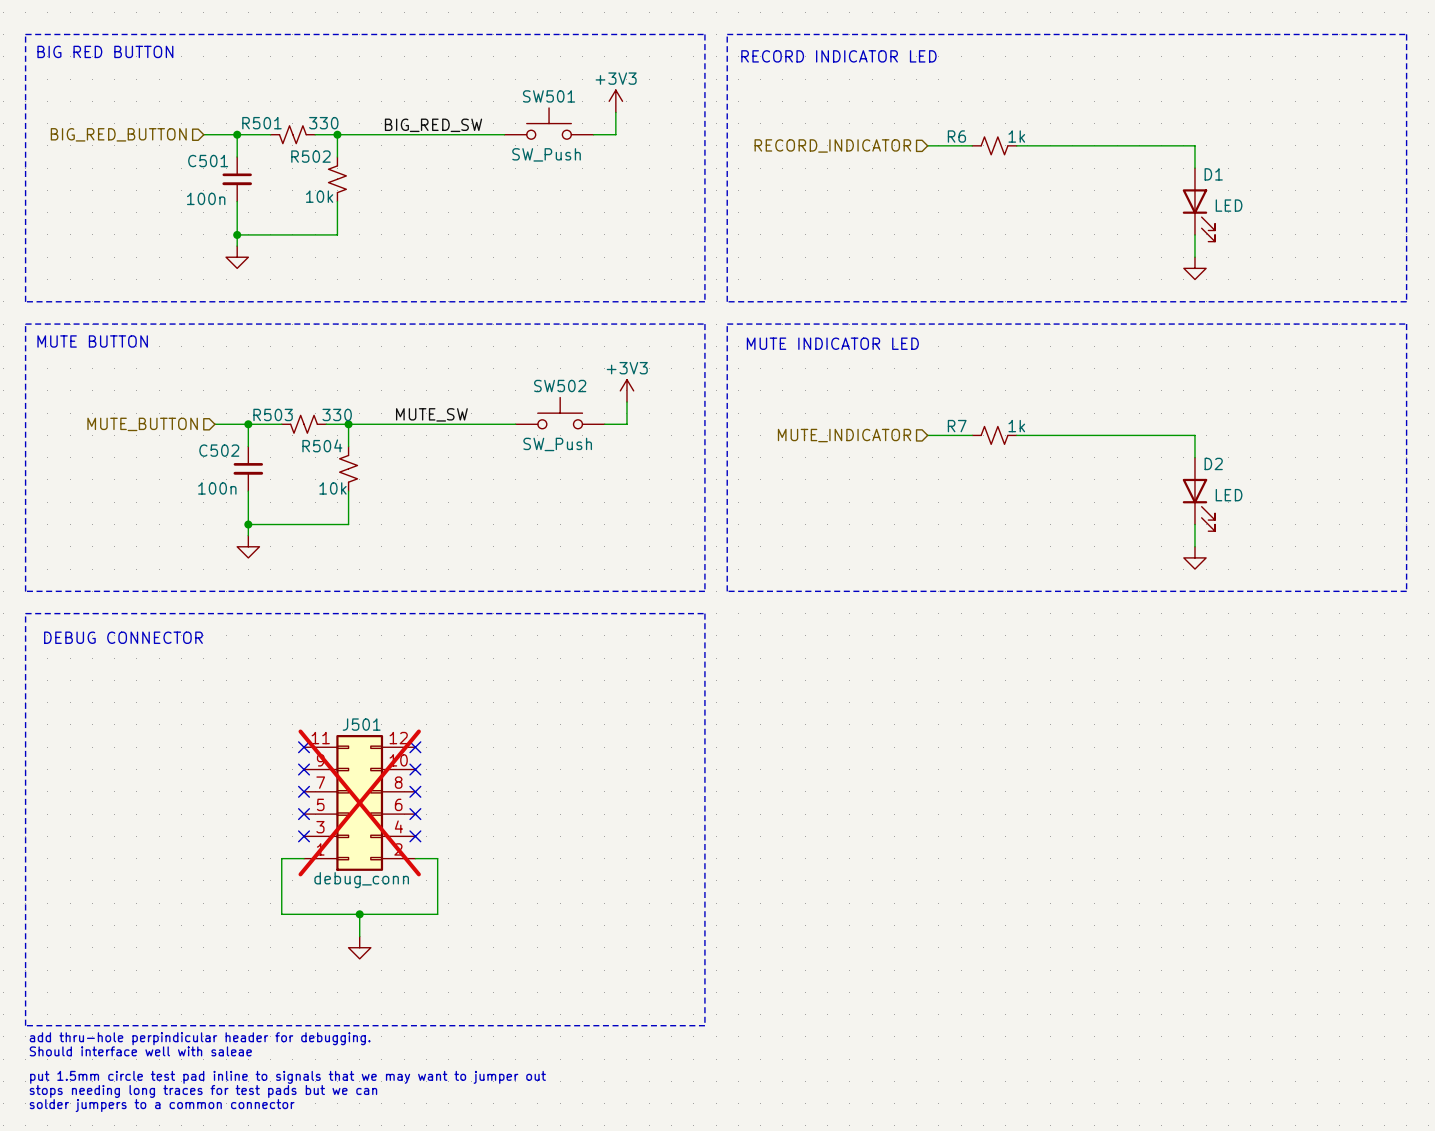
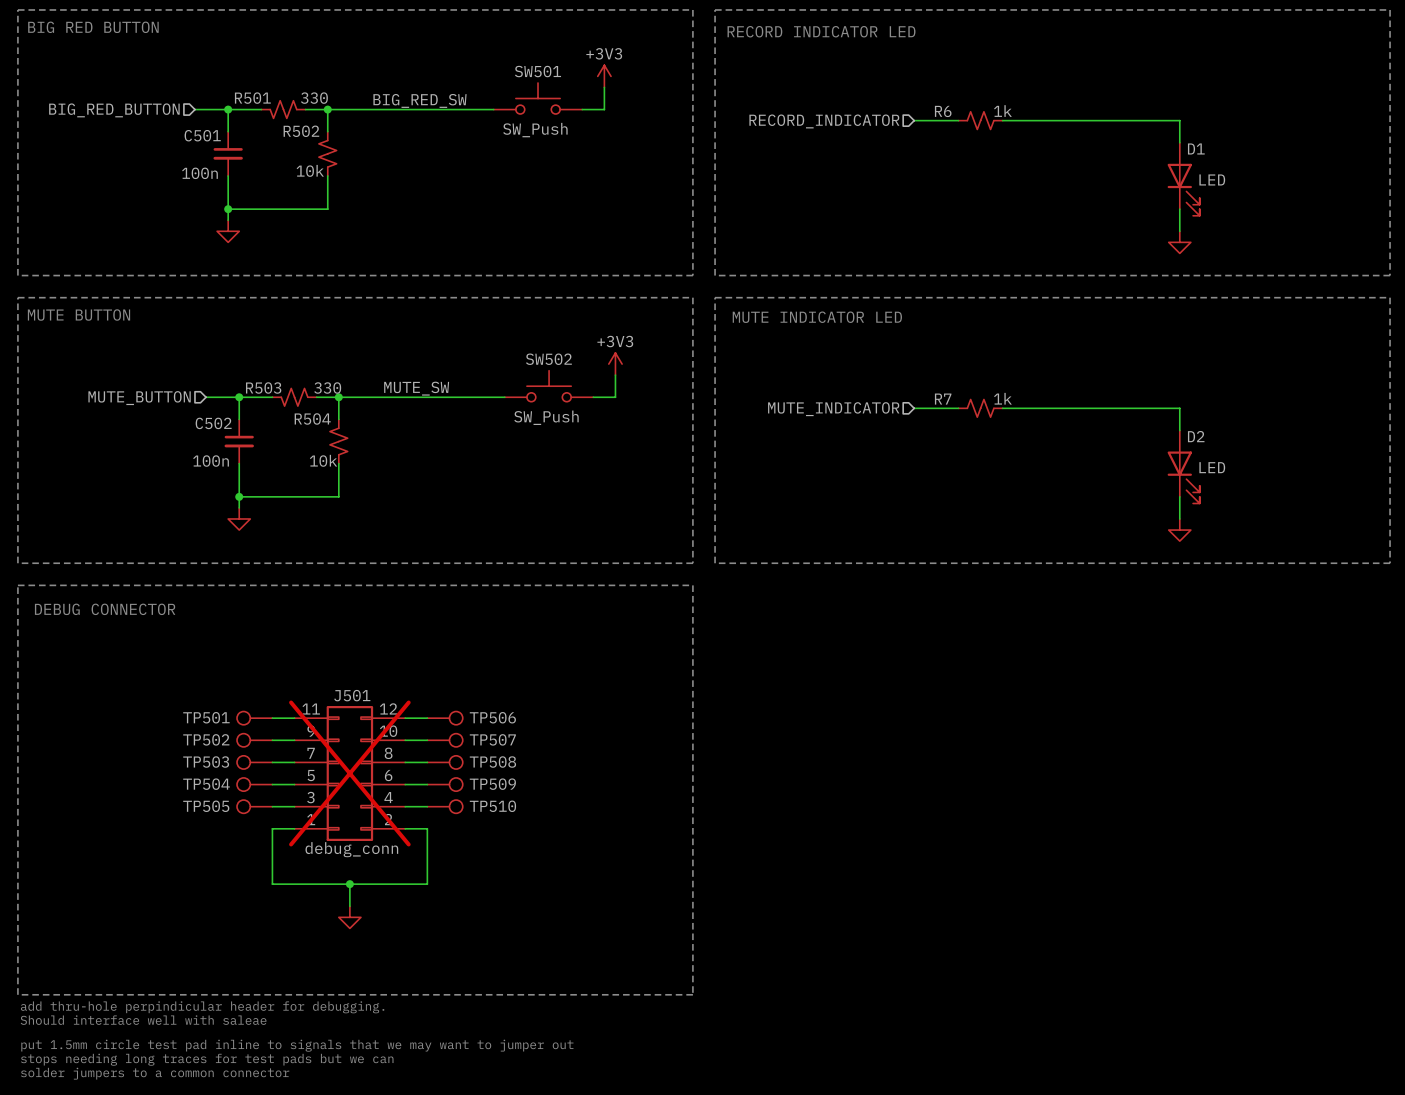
TP501: none -> (254, 718)
wire: none -> (272, 718) (294, 718)
no-connect mark: (304, 747) -> none
wire: none -> (405, 718) (427, 718)
no-connect mark: (415, 747) -> none
TP506: none -> (445, 718)
TP502: none -> (254, 740)
wire: none -> (272, 740) (294, 740)
no-connect mark: (304, 769) -> none
wire: none -> (405, 740) (427, 740)
no-connect mark: (415, 769) -> none
TP507: none -> (445, 740)
TP503: none -> (254, 762)
wire: none -> (272, 762) (294, 762)
no-connect mark: (304, 791) -> none
wire: none -> (405, 762) (427, 762)
no-connect mark: (415, 791) -> none
TP508: none -> (445, 762)
TP504: none -> (254, 784)
wire: none -> (272, 784) (294, 784)
no-connect mark: (304, 814) -> none
wire: none -> (405, 784) (427, 784)
no-connect mark: (415, 814) -> none
TP509: none -> (445, 784)
TP505: none -> (254, 806)
wire: none -> (272, 806) (294, 806)
no-connect mark: (304, 836) -> none
wire: none -> (405, 806) (427, 806)
no-connect mark: (415, 836) -> none
TP510: none -> (445, 806)

